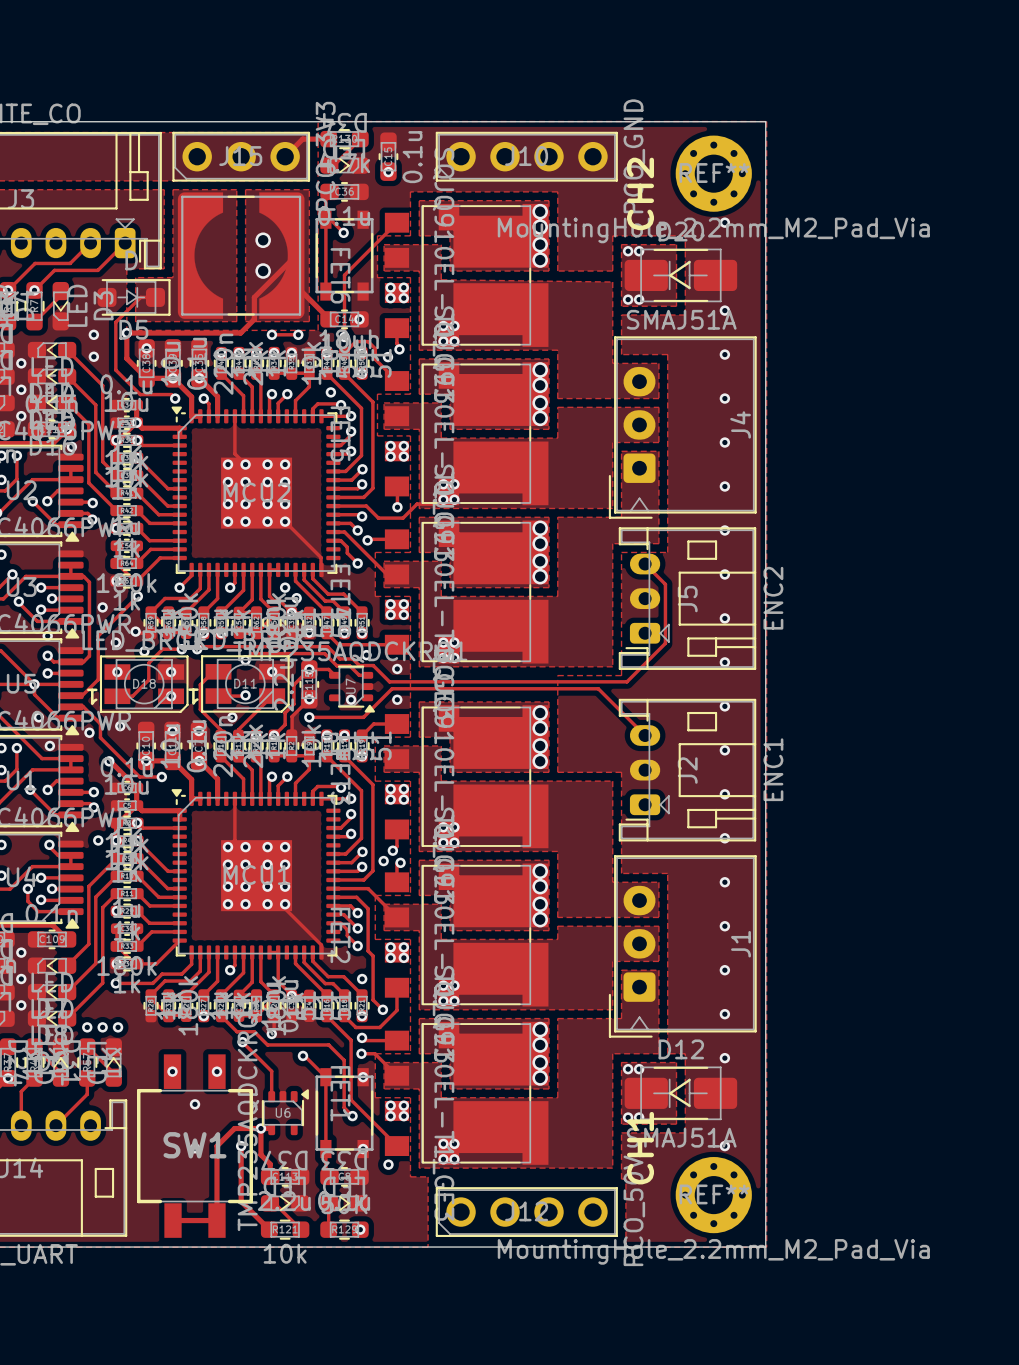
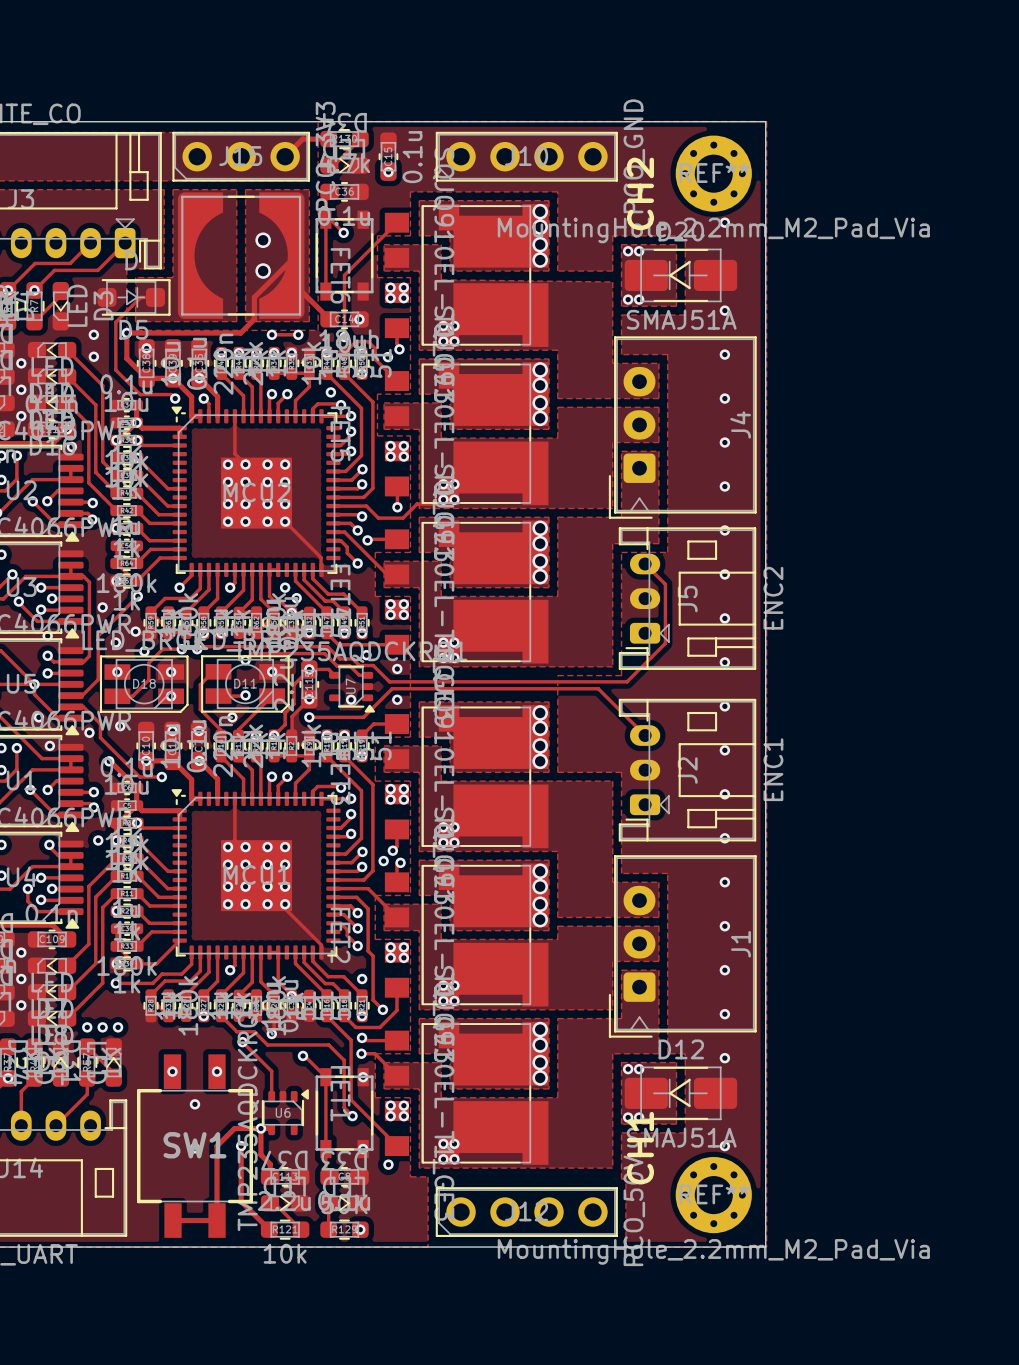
D18 text: 1 (92, 696) -> none
D11 text: 1 (193, 696) -> none

